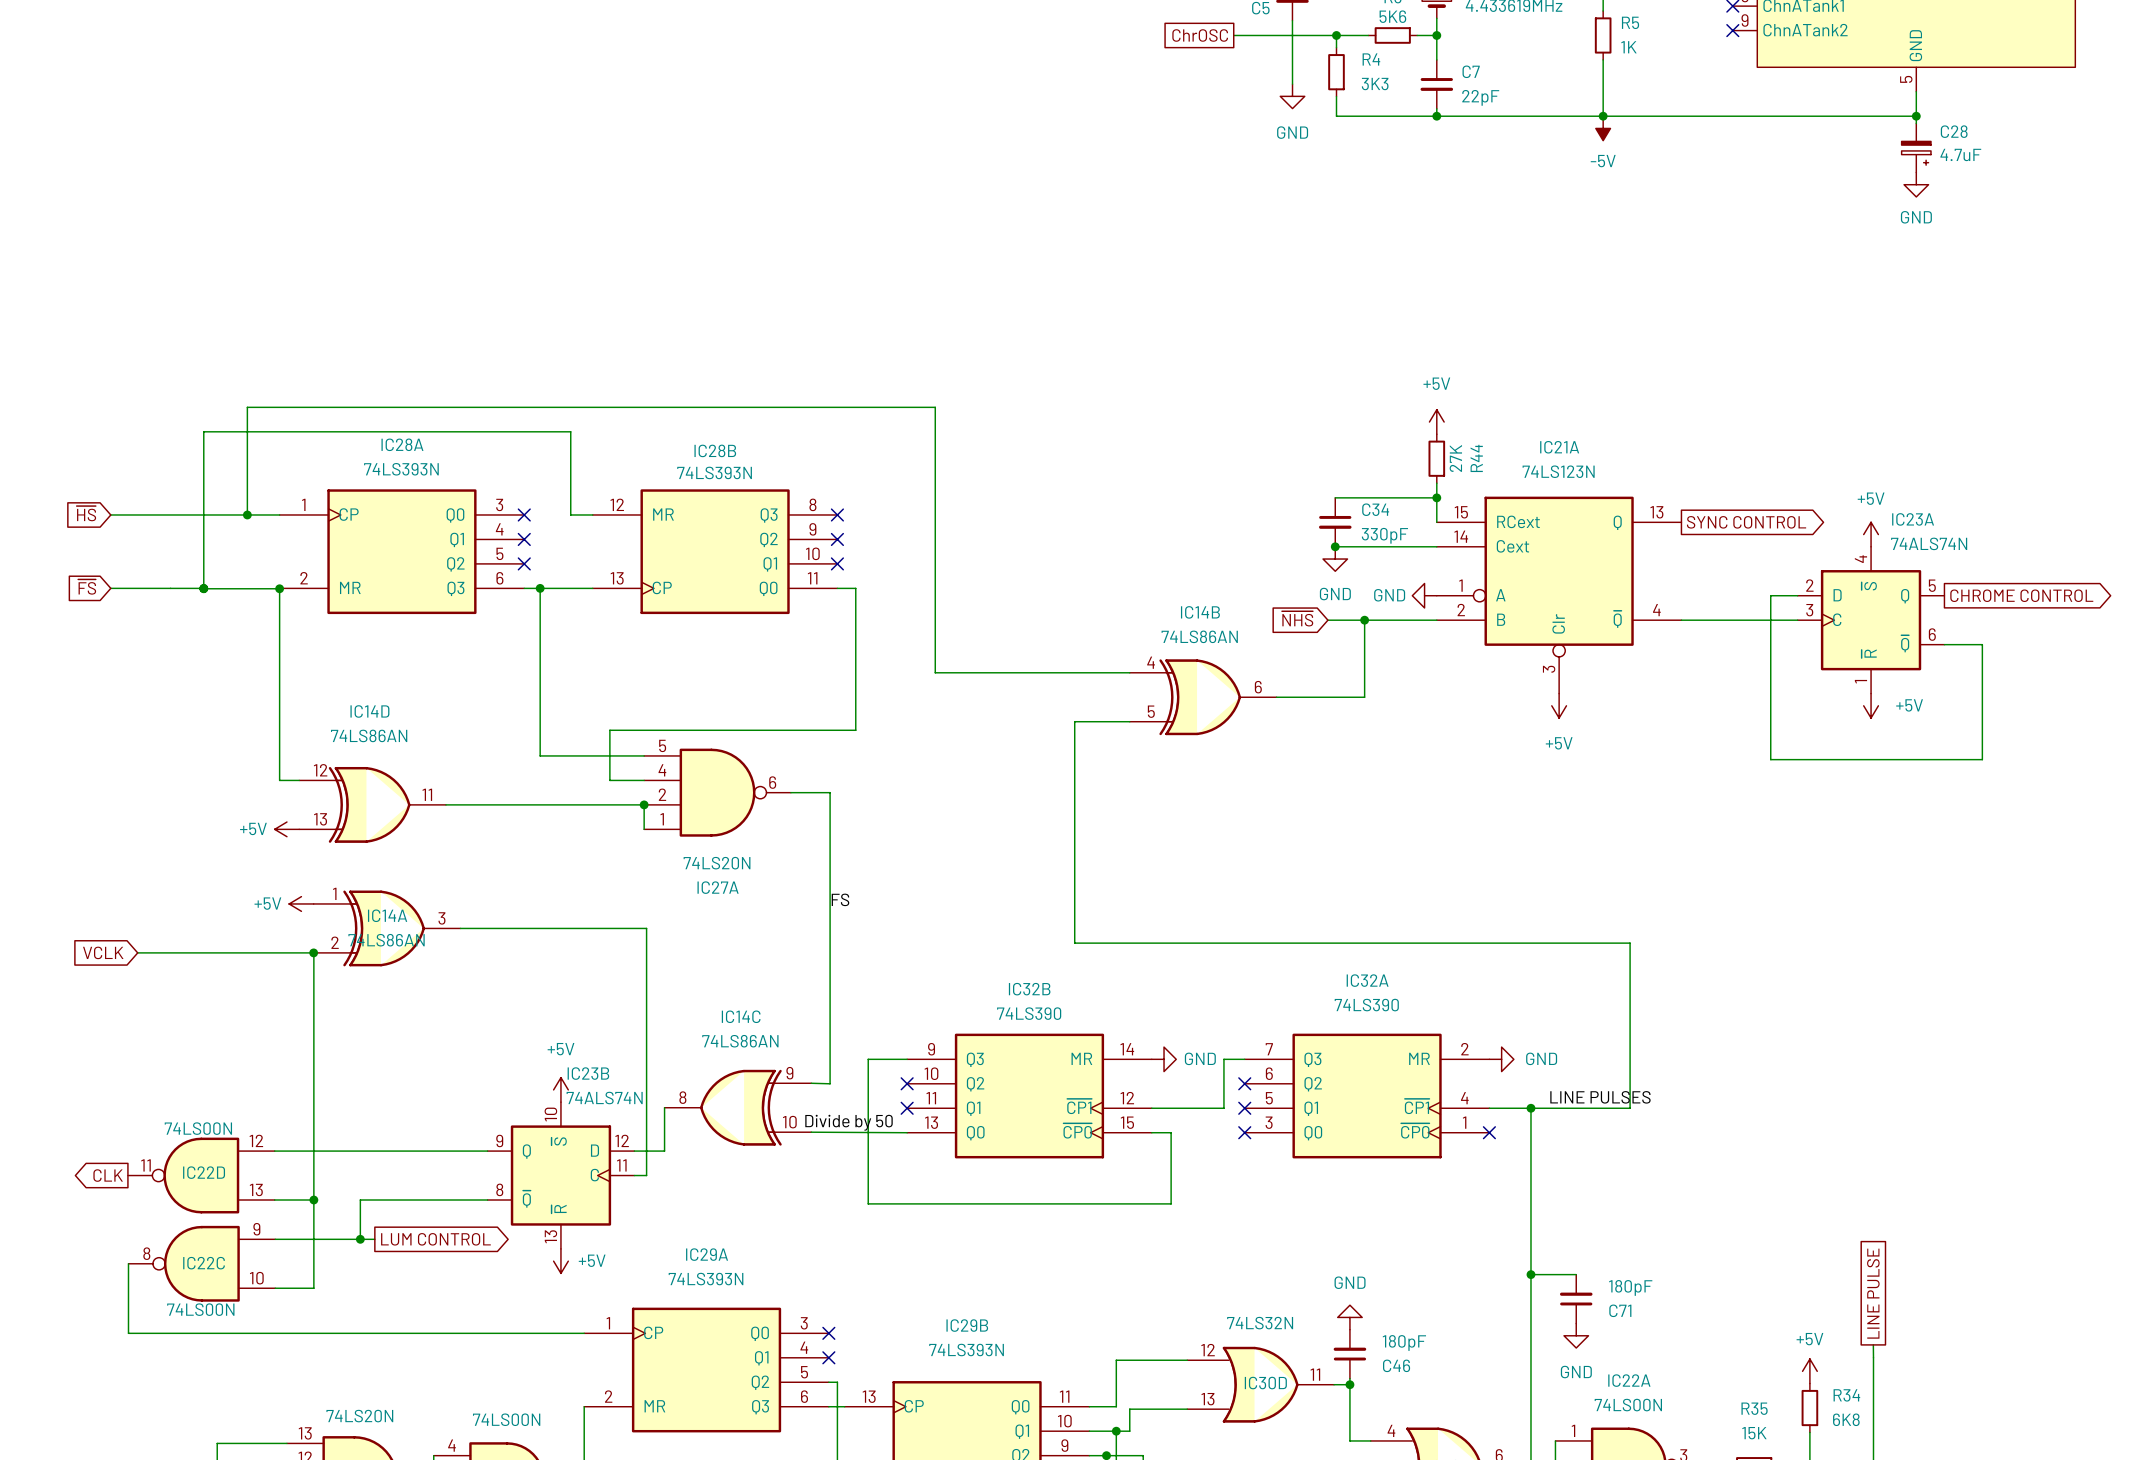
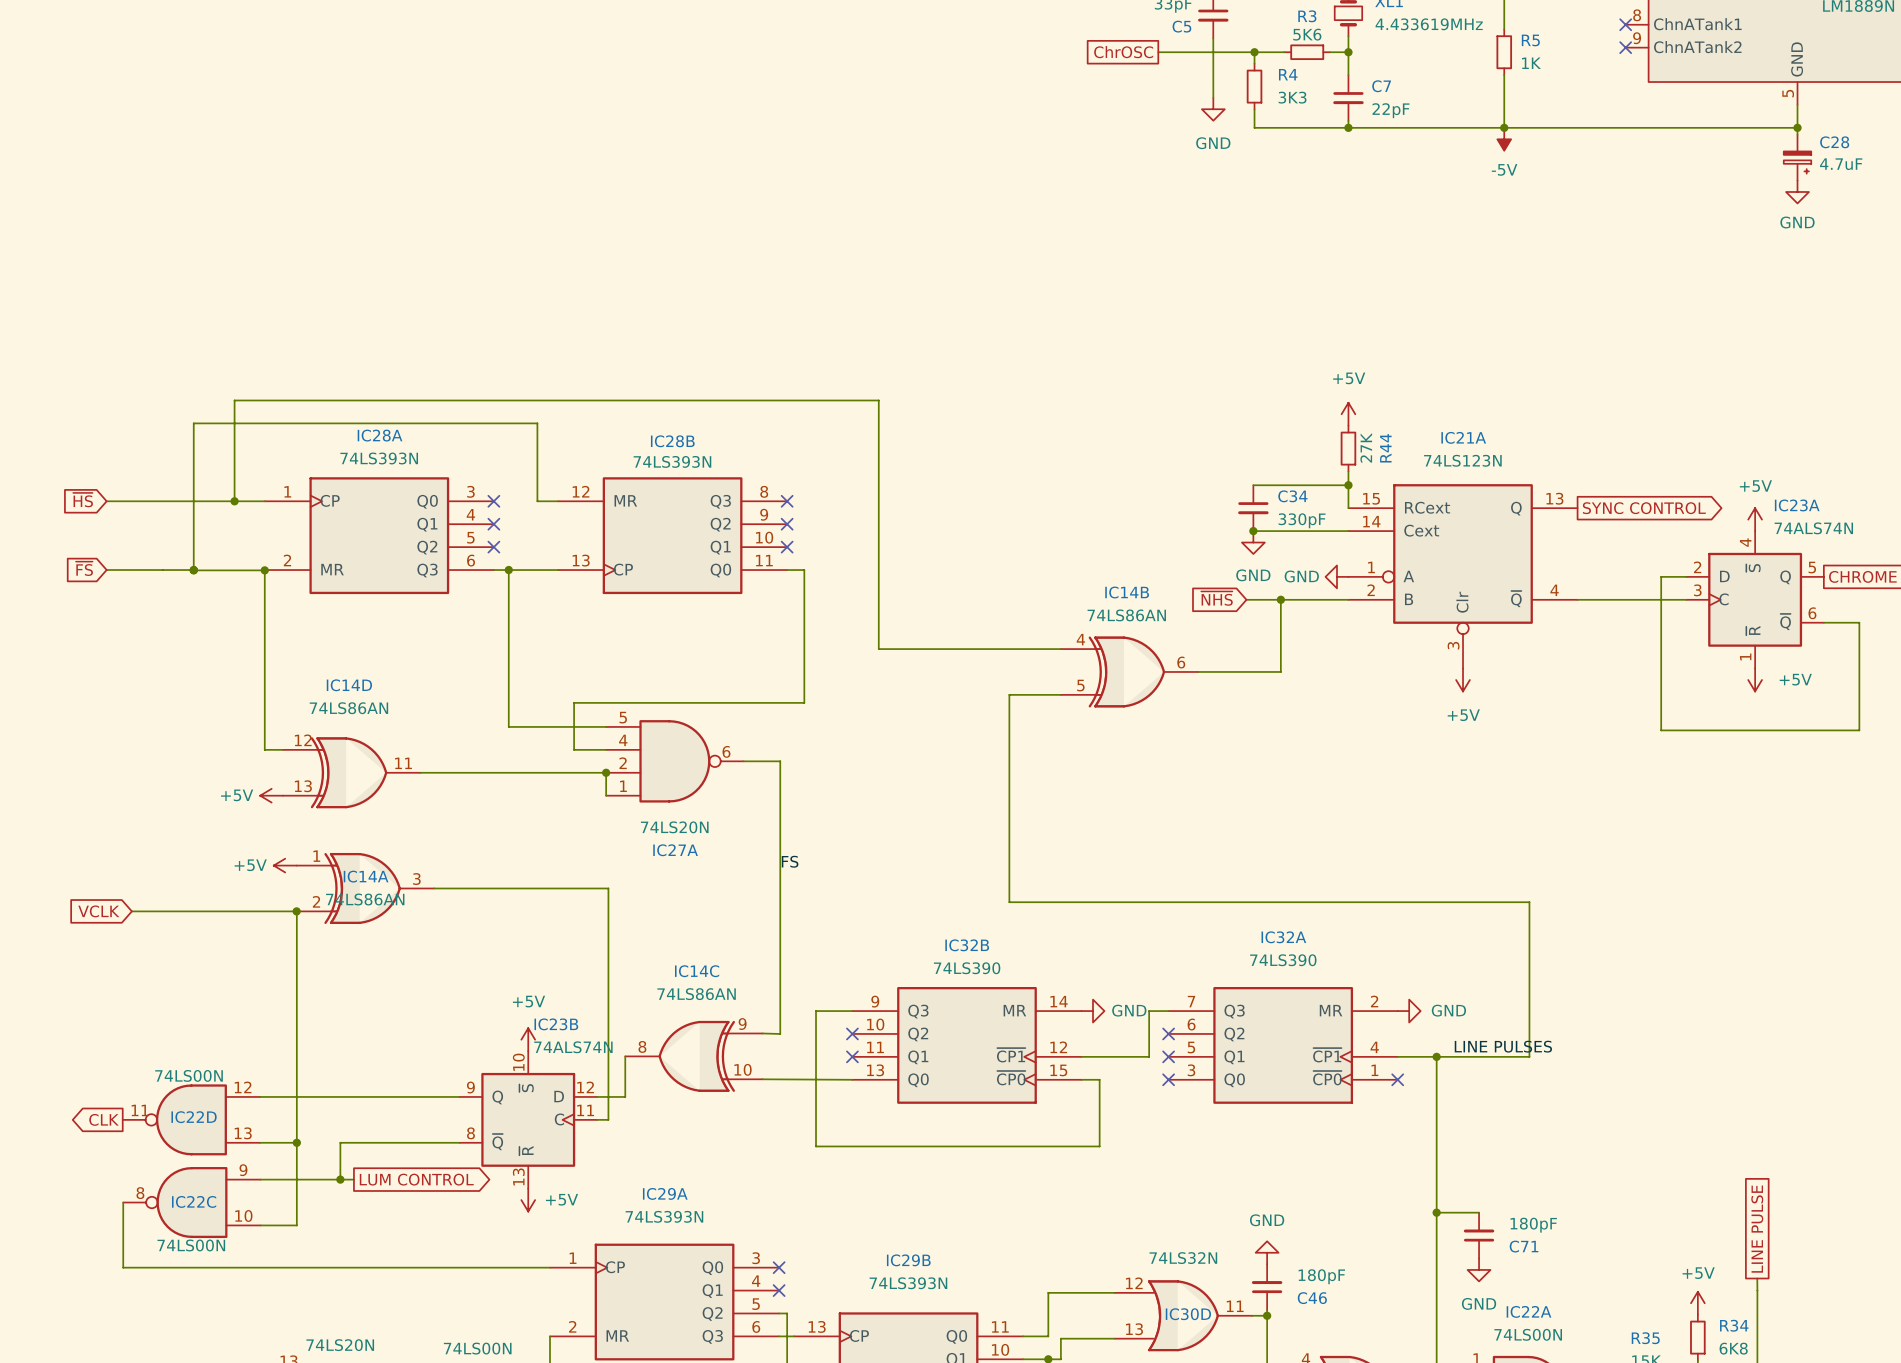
label: Divide by 50 (849, 1122) -> none

